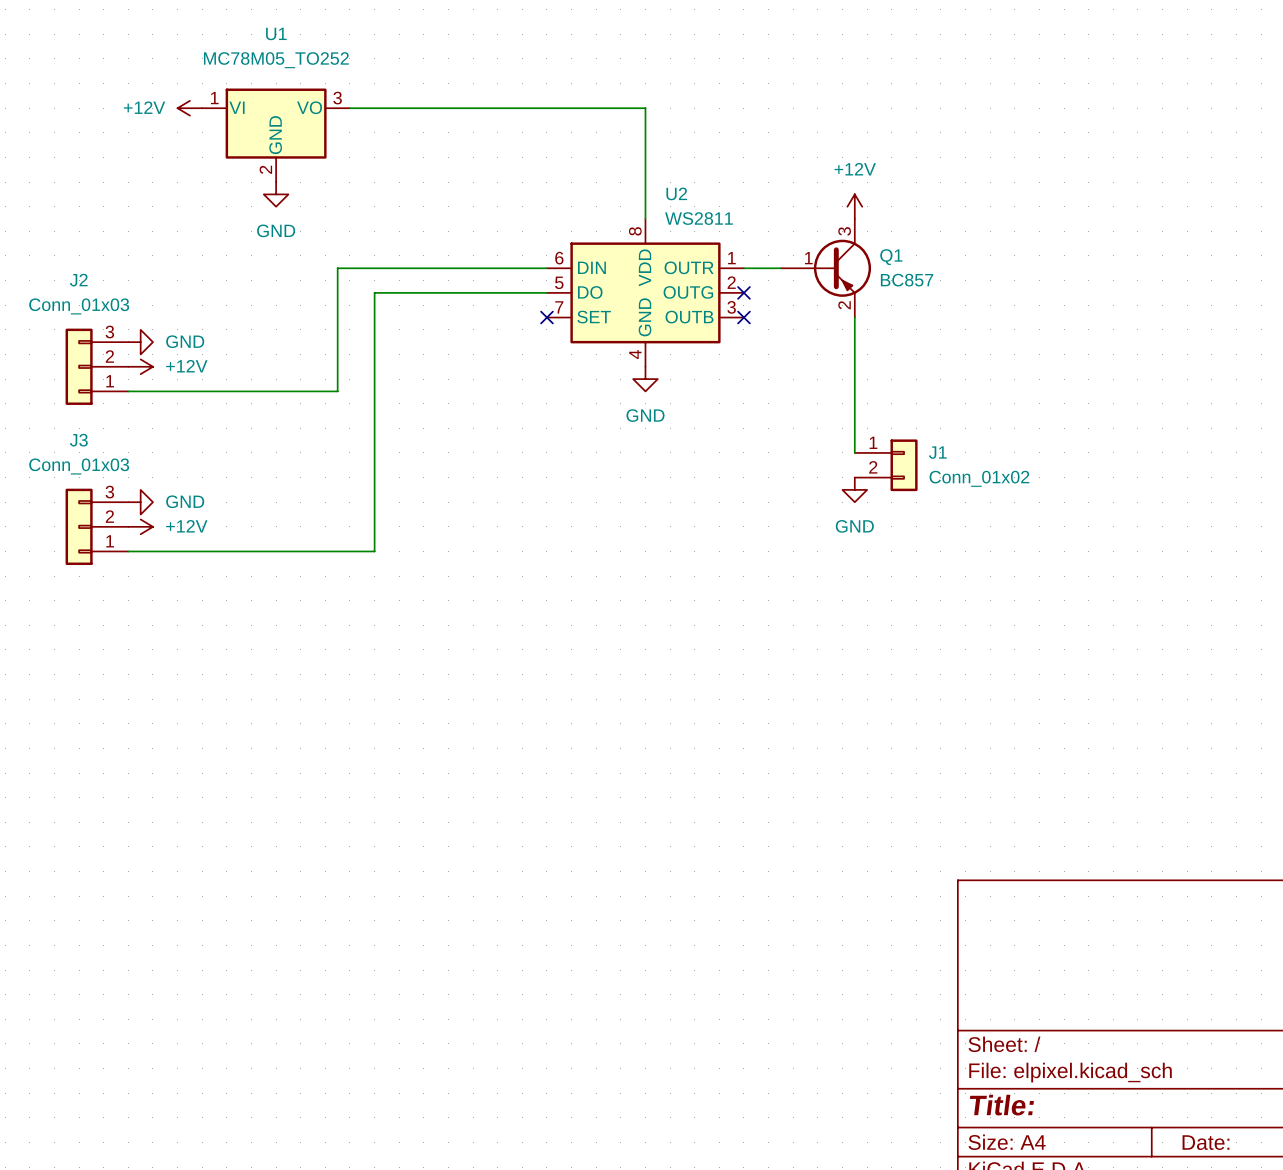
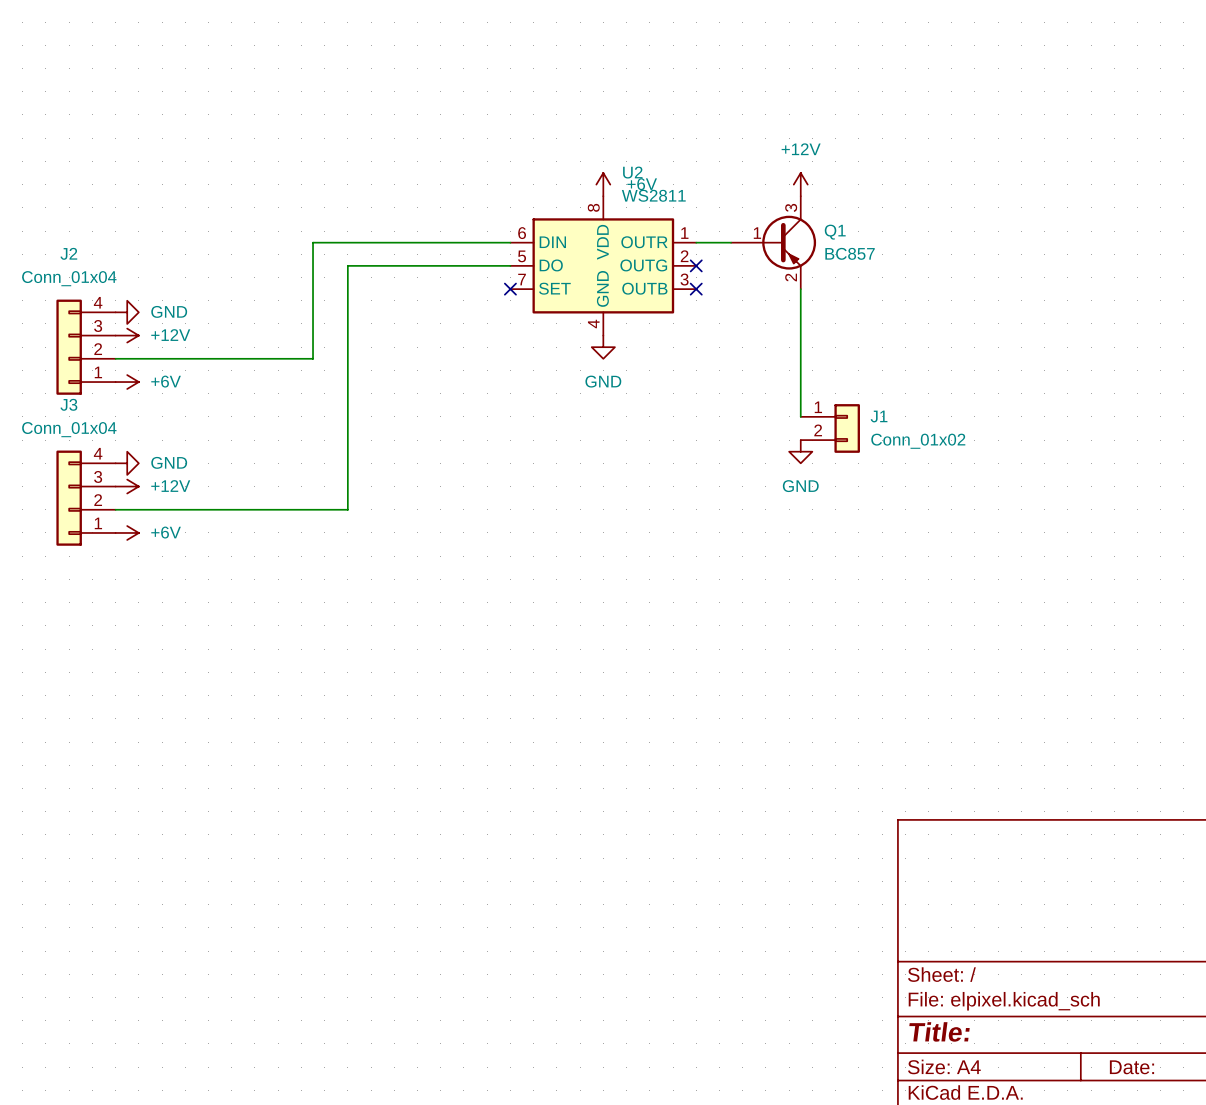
power symbol: +12V (189, 108) -> none
wire: (349, 108) (645, 108) (645, 219) -> none
U1: MC78M05_TO252 (276, 135) -> none
power symbol: GND (276, 194) -> none
power symbol: none -> +6V (603, 184)
J2 value: Conn_01x03 (79, 306) -> Conn_01x04 (69, 278)
J2 symbol: [65, 328, 129, 405] -> [56, 299, 116, 395]
power symbol: none -> +6V (127, 382)
J3 value: Conn_01x03 (79, 466) -> Conn_01x04 (69, 429)
J3 symbol: [65, 488, 129, 566] -> [56, 450, 116, 546]
power symbol: none -> +6V (127, 532)

